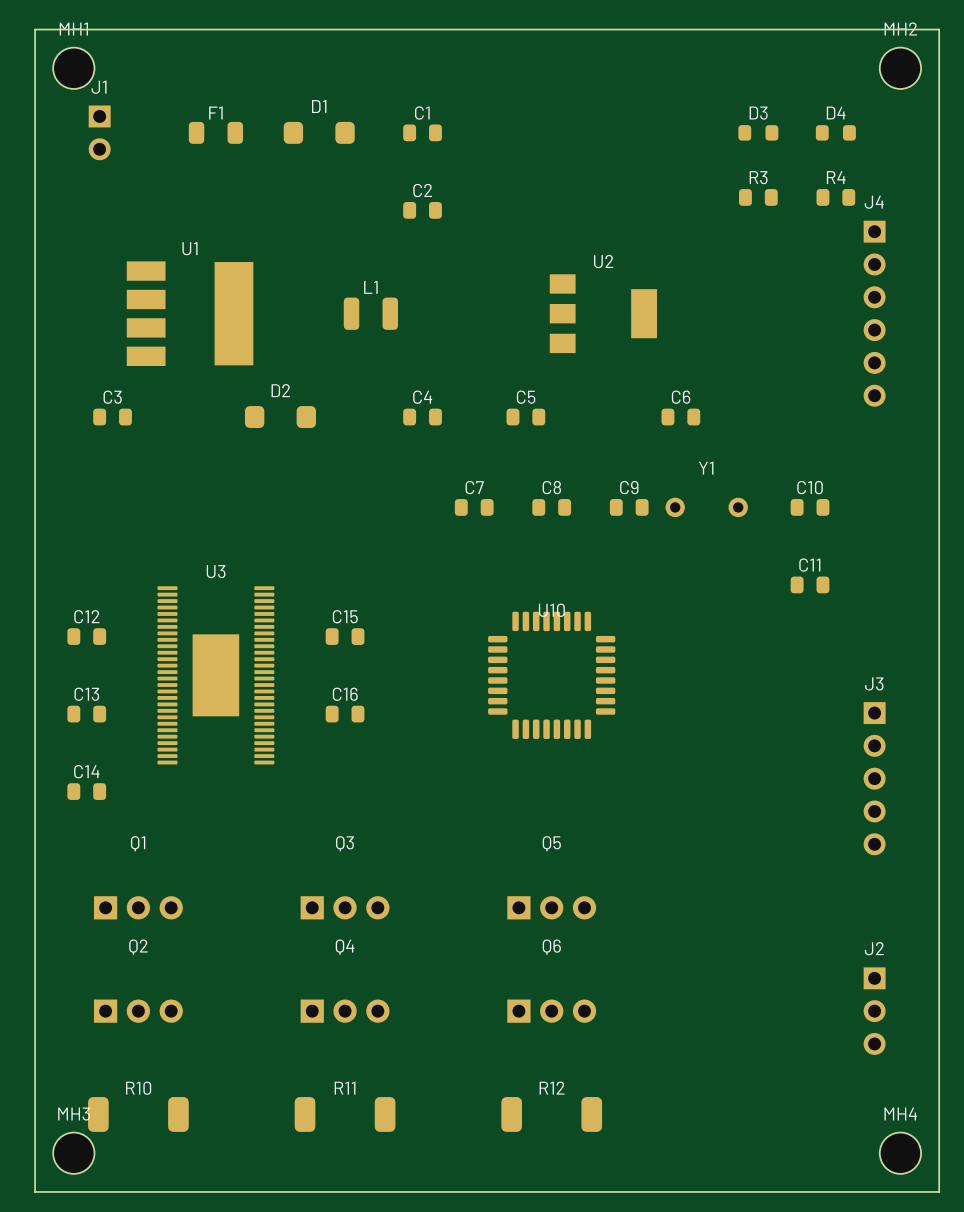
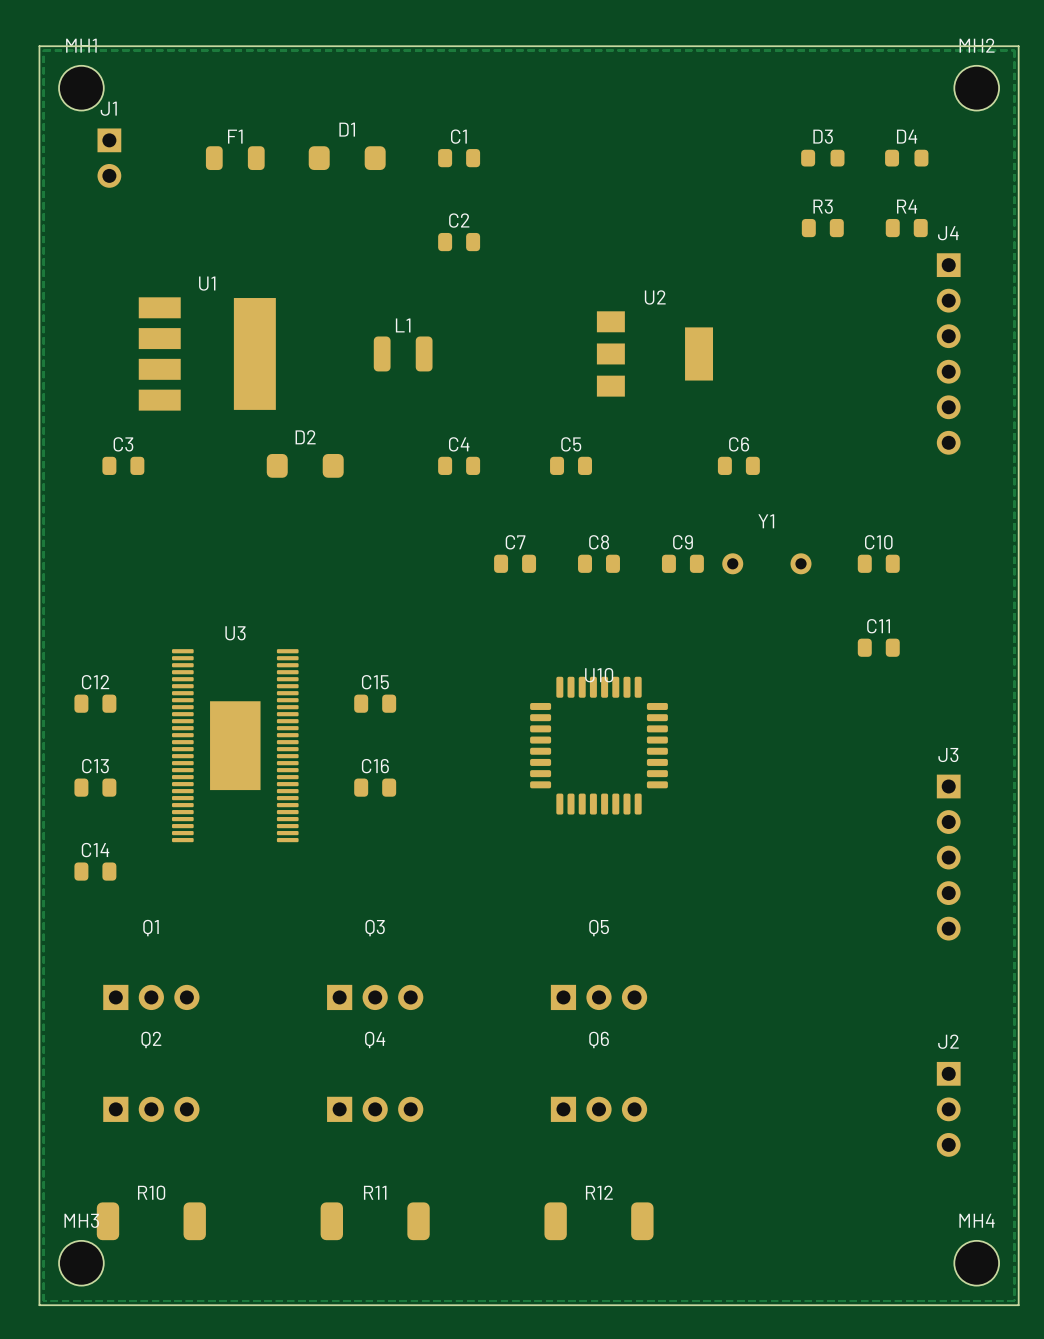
zone outline: none -> (43, 50) (1014, 50) (1014, 1301) (43, 1301) (43, 50)

